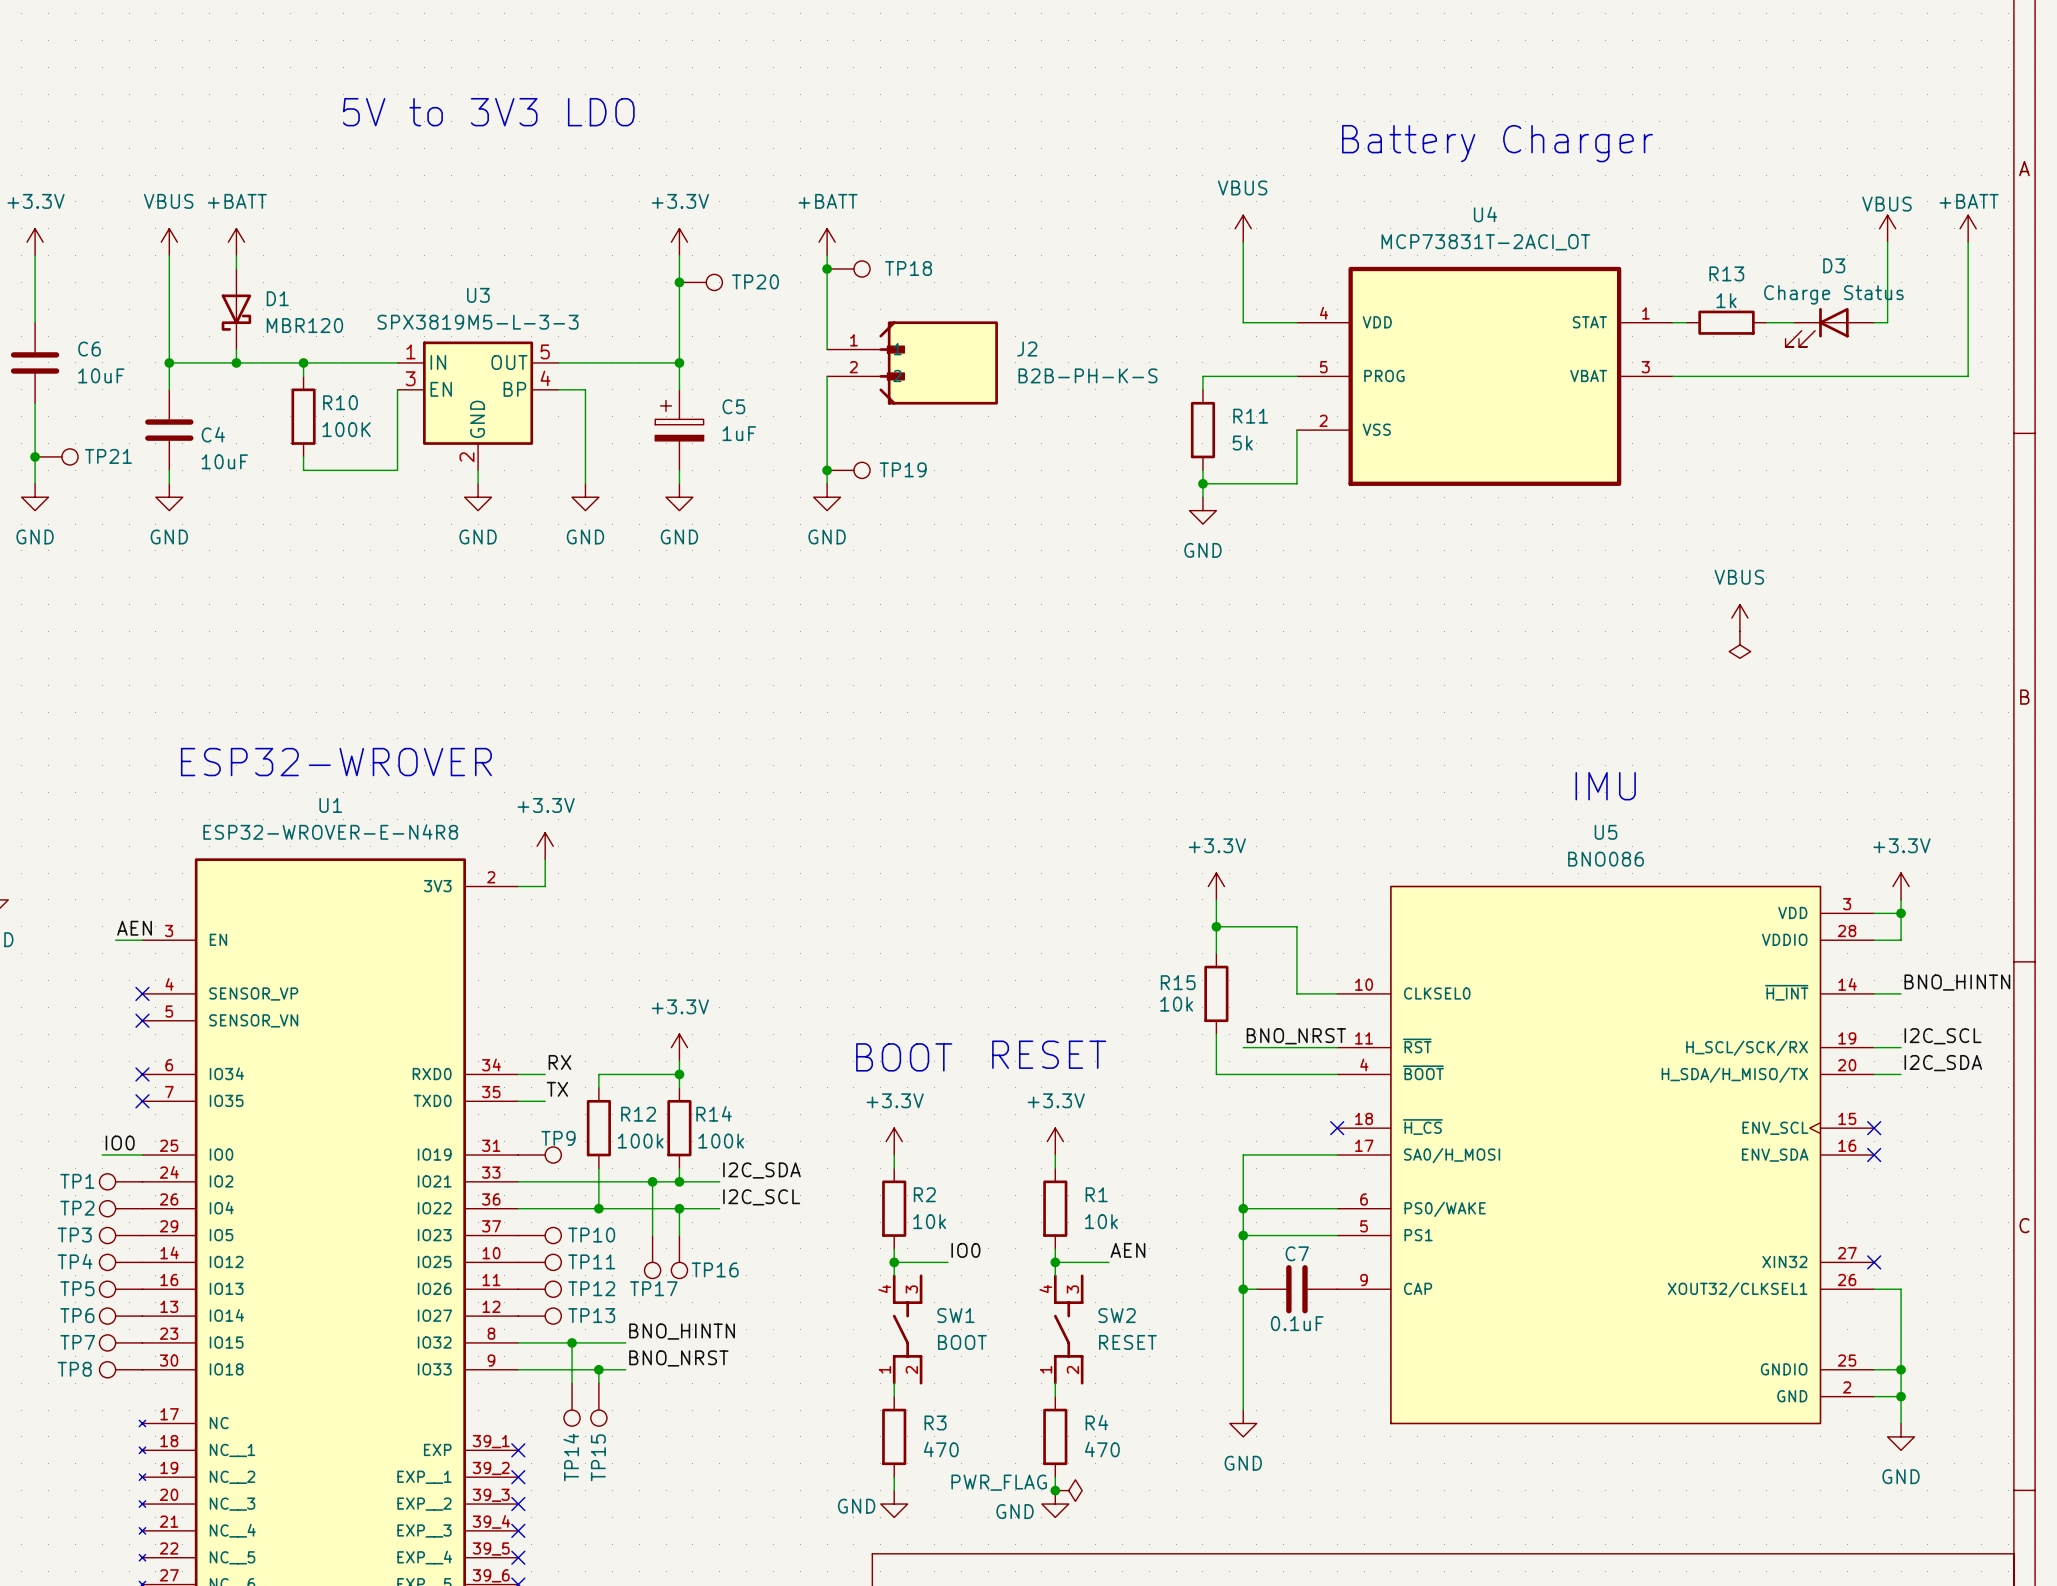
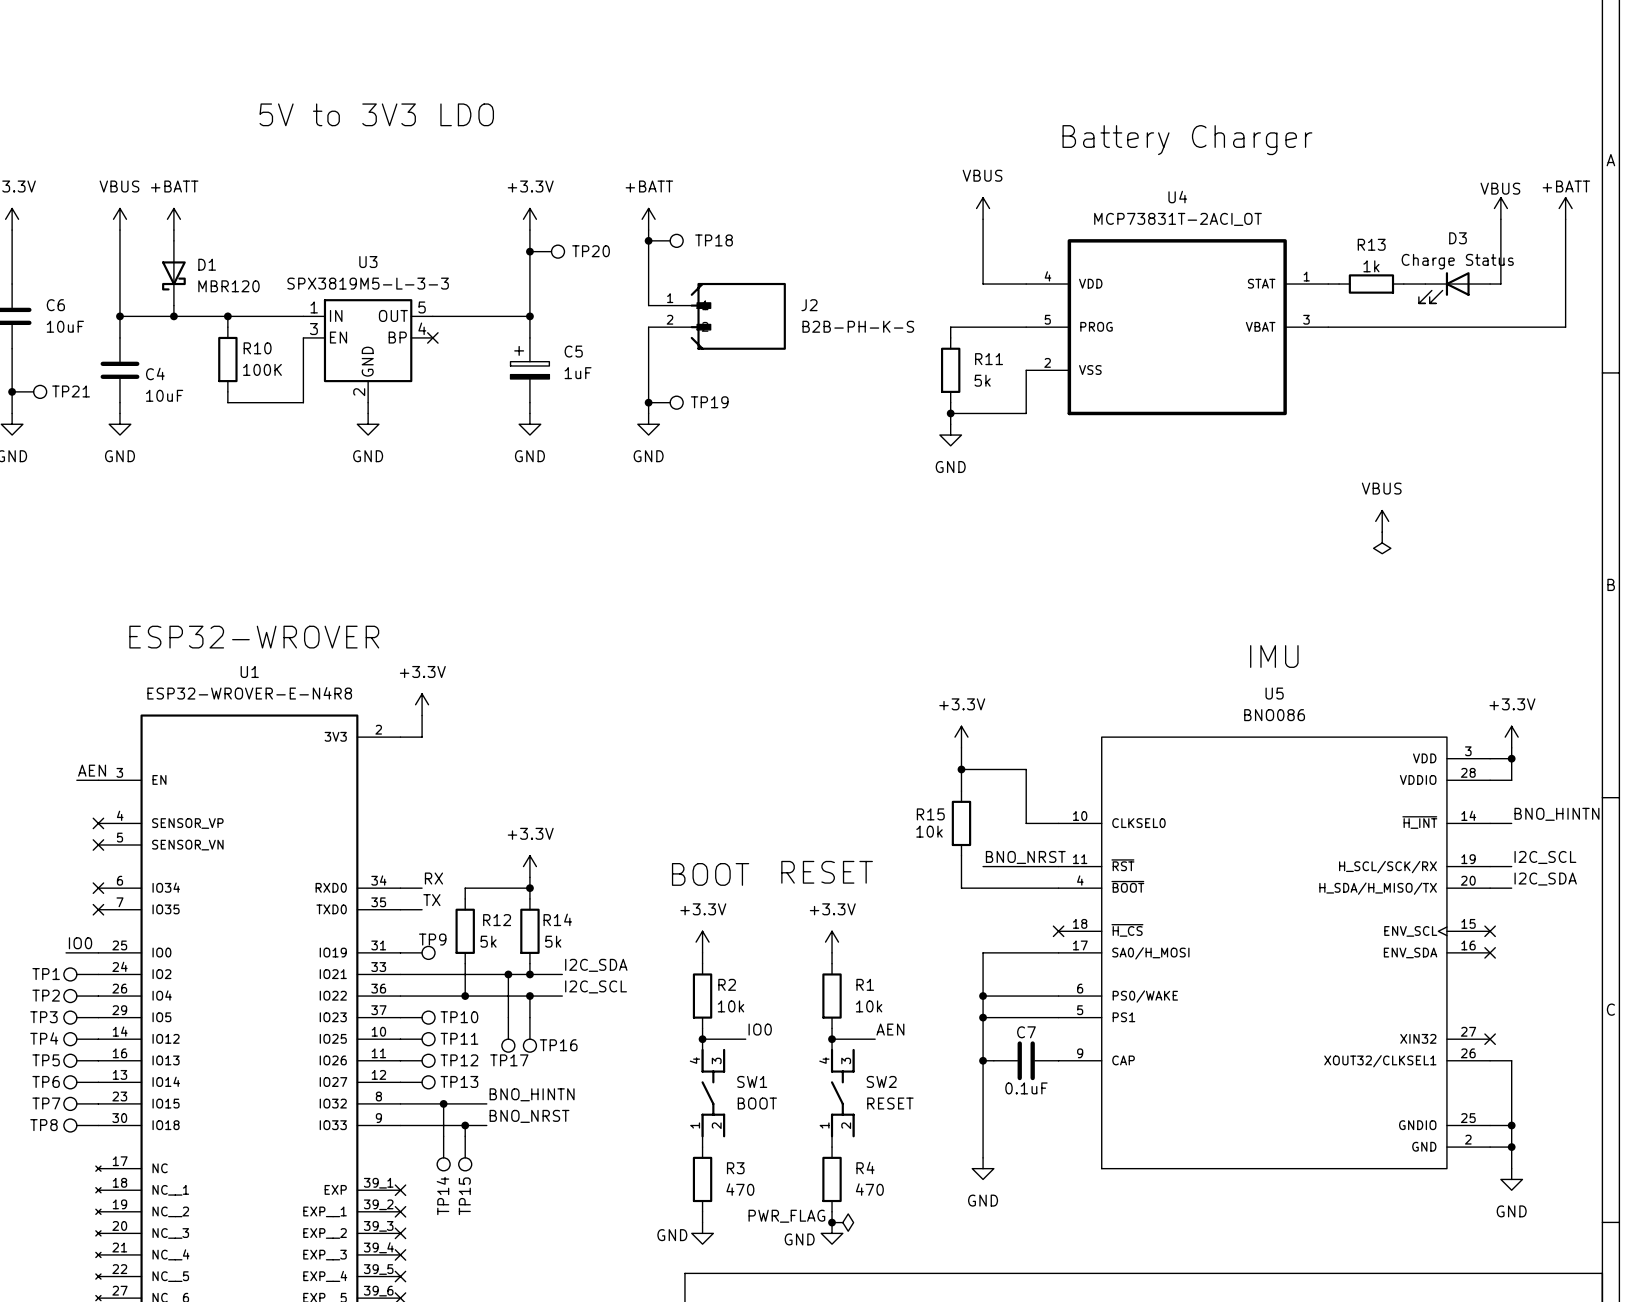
wire: (558, 389) (585, 389) (585, 483) -> none
no-connect mark: none -> (432, 337)
power symbol: GND (585, 497) -> none
R12 value: 100k (640, 1141) -> 5k (488, 941)
R14 value: 100k (721, 1141) -> 5k (553, 941)

